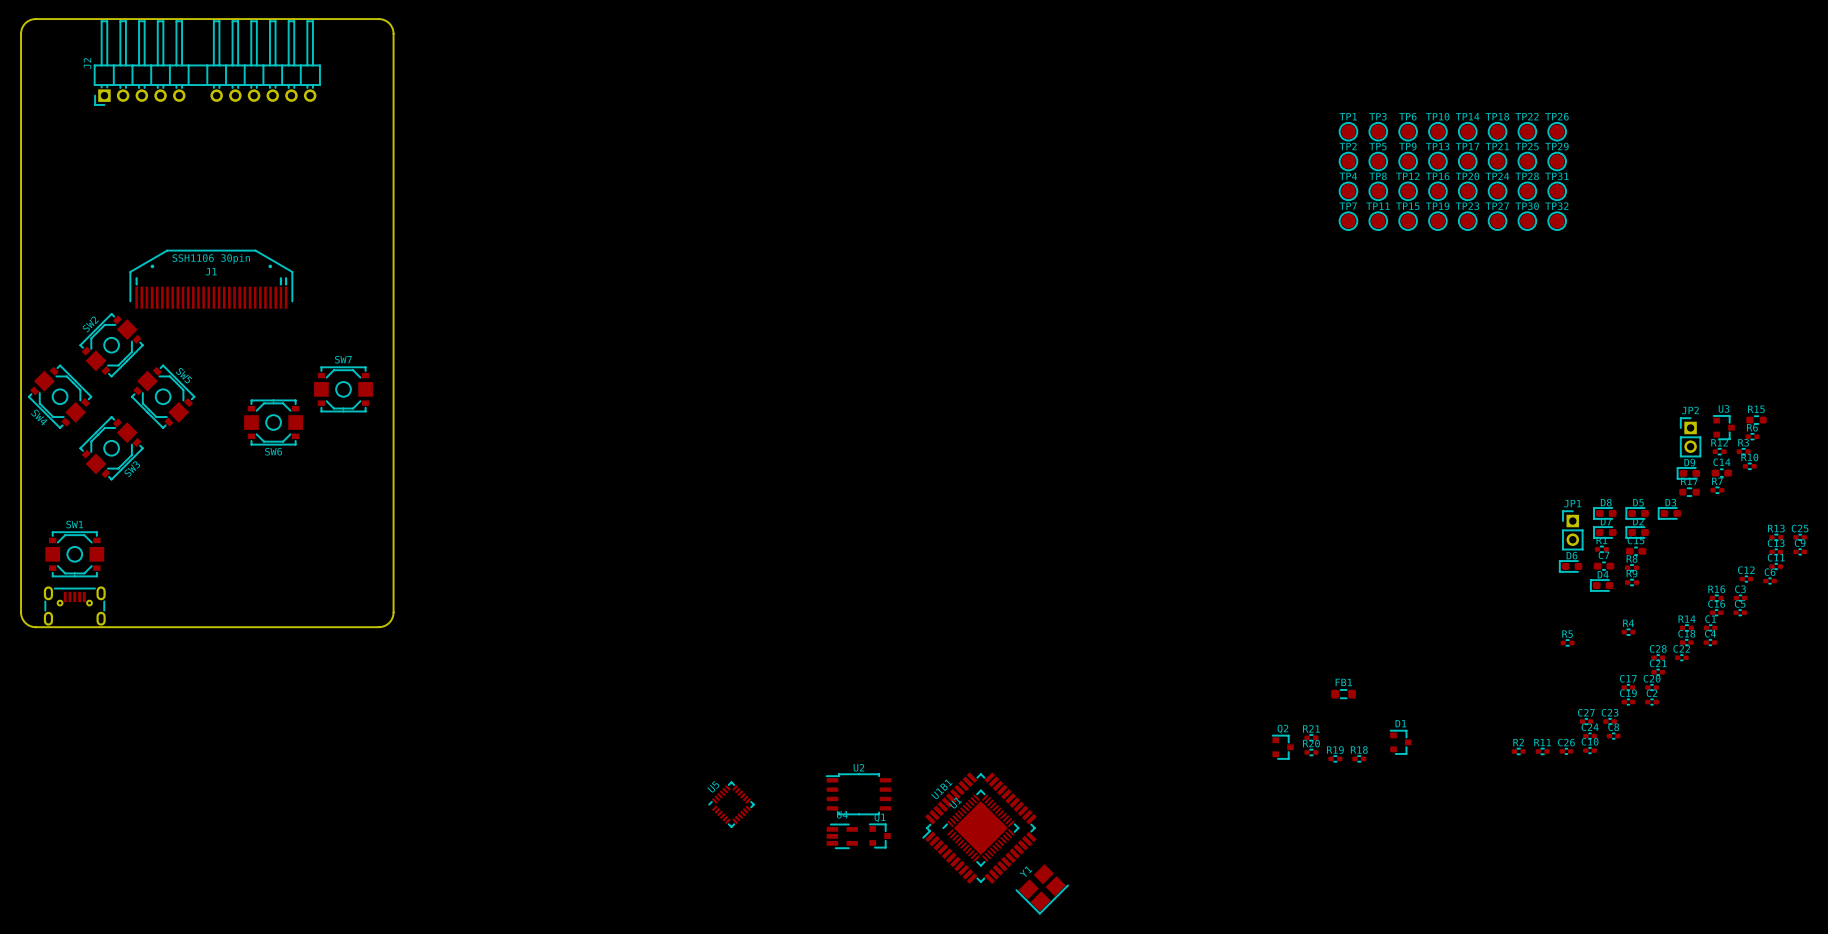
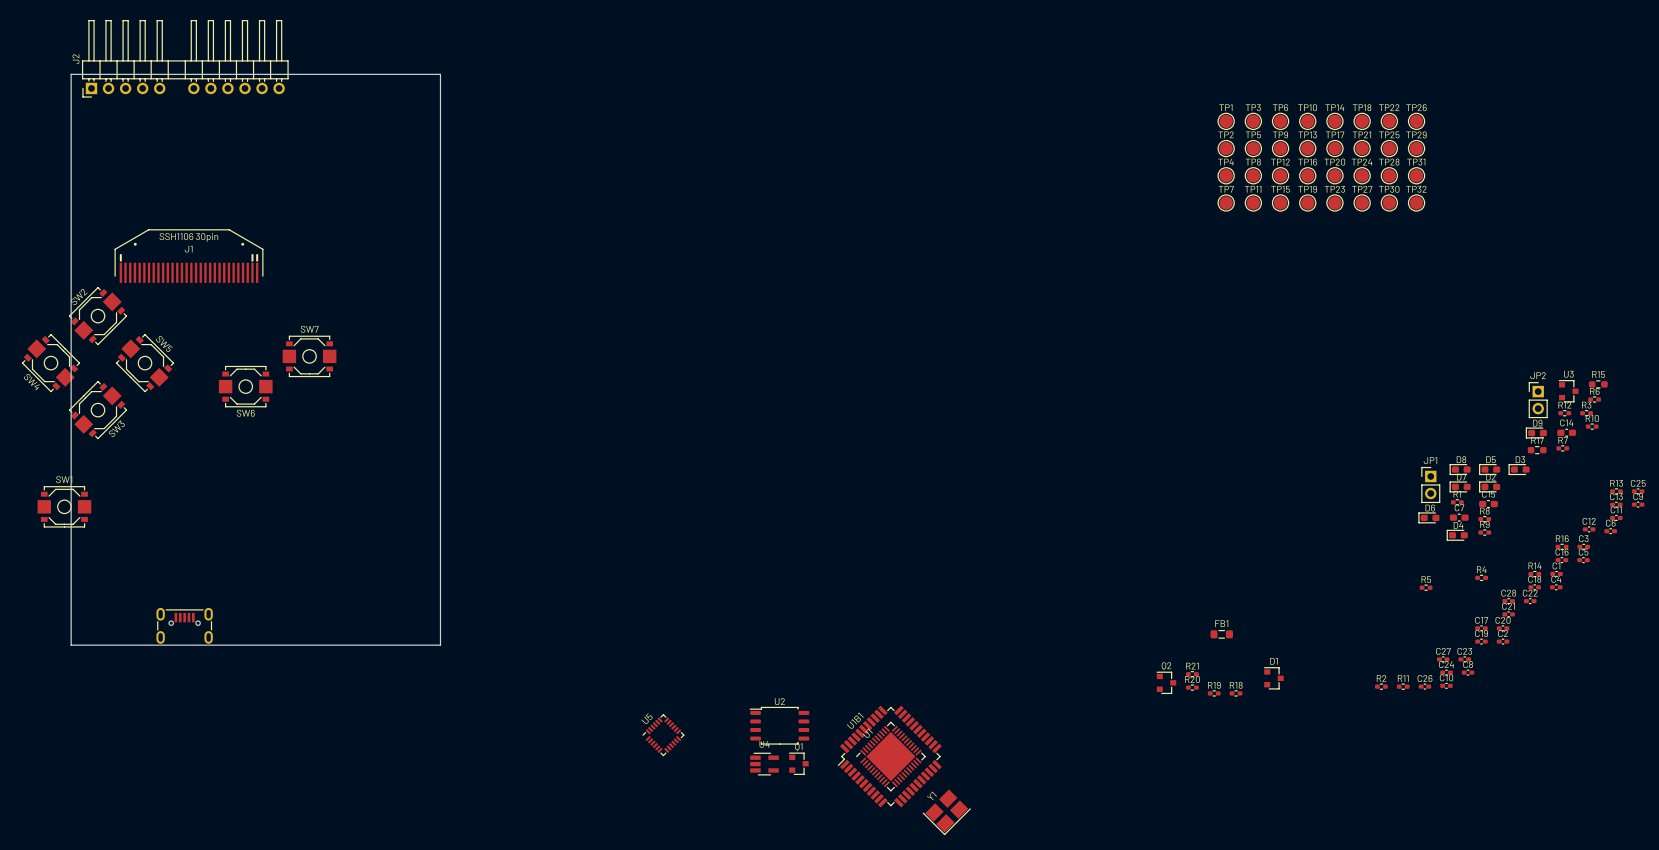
board edge: (35, 19) (378, 19) (386, 21) (391, 26) (393, 33) (393, 612) (391, 619) (386, 625) (378, 627) (35, 627) (28, 625) (23, 619) (21, 612) (21, 33) (25, 23) (35, 19) -> (71, 74) (71, 645) (440, 645) (440, 74) (71, 74)
part position: (74, 606) -> (184, 625)

